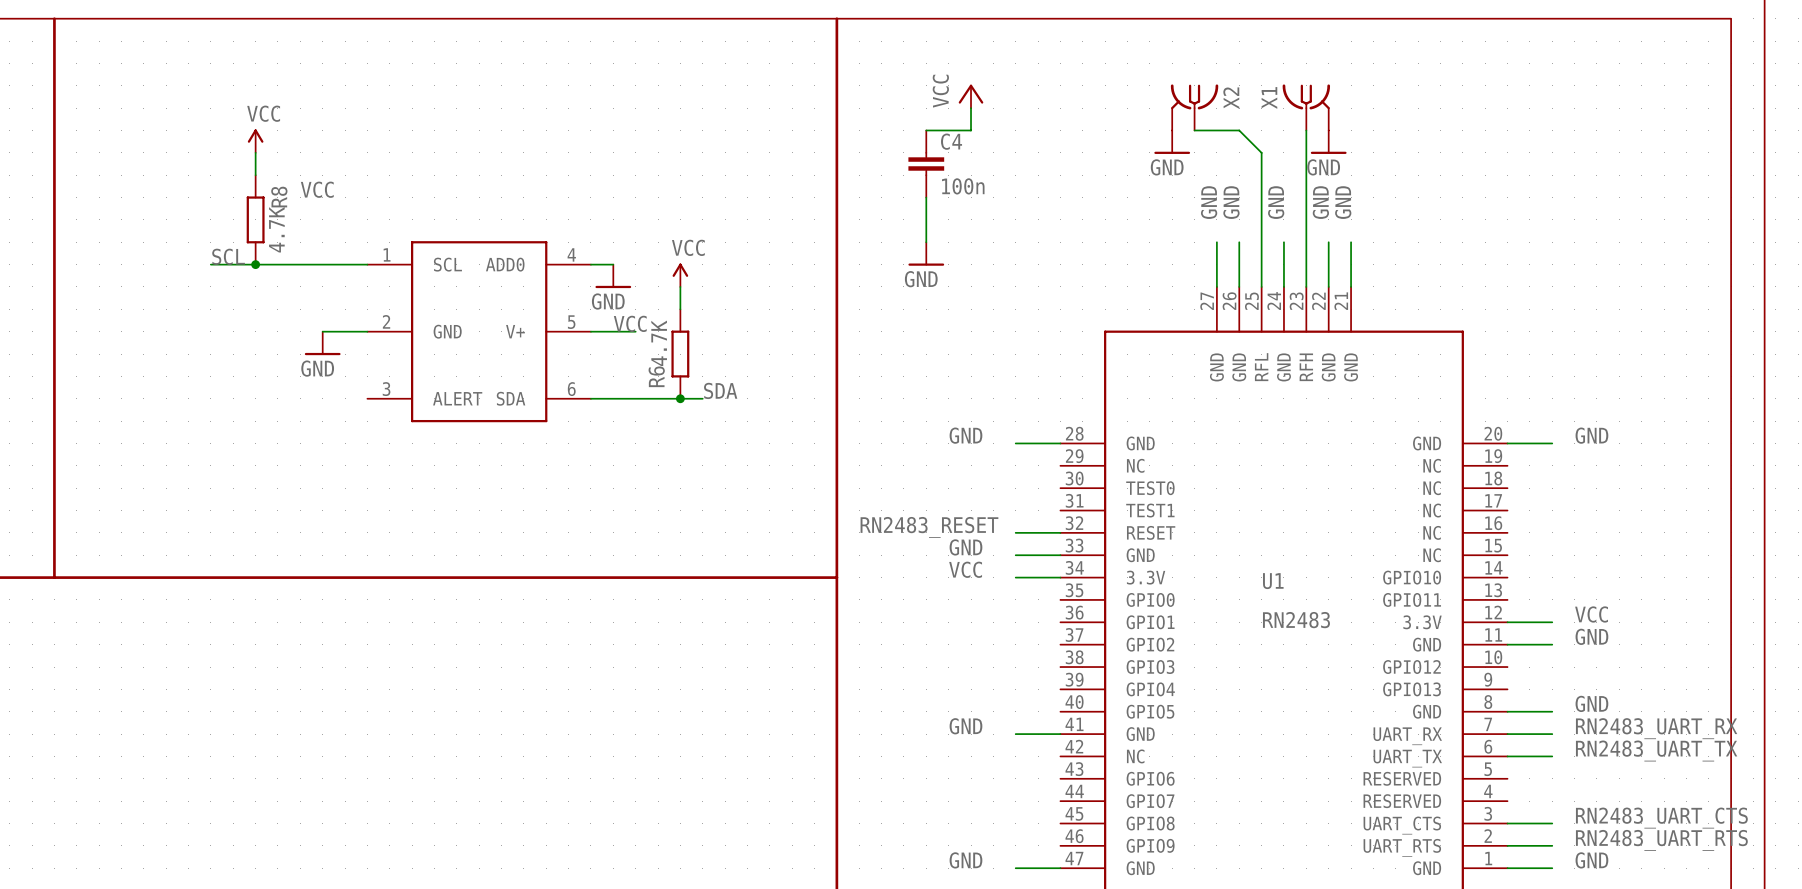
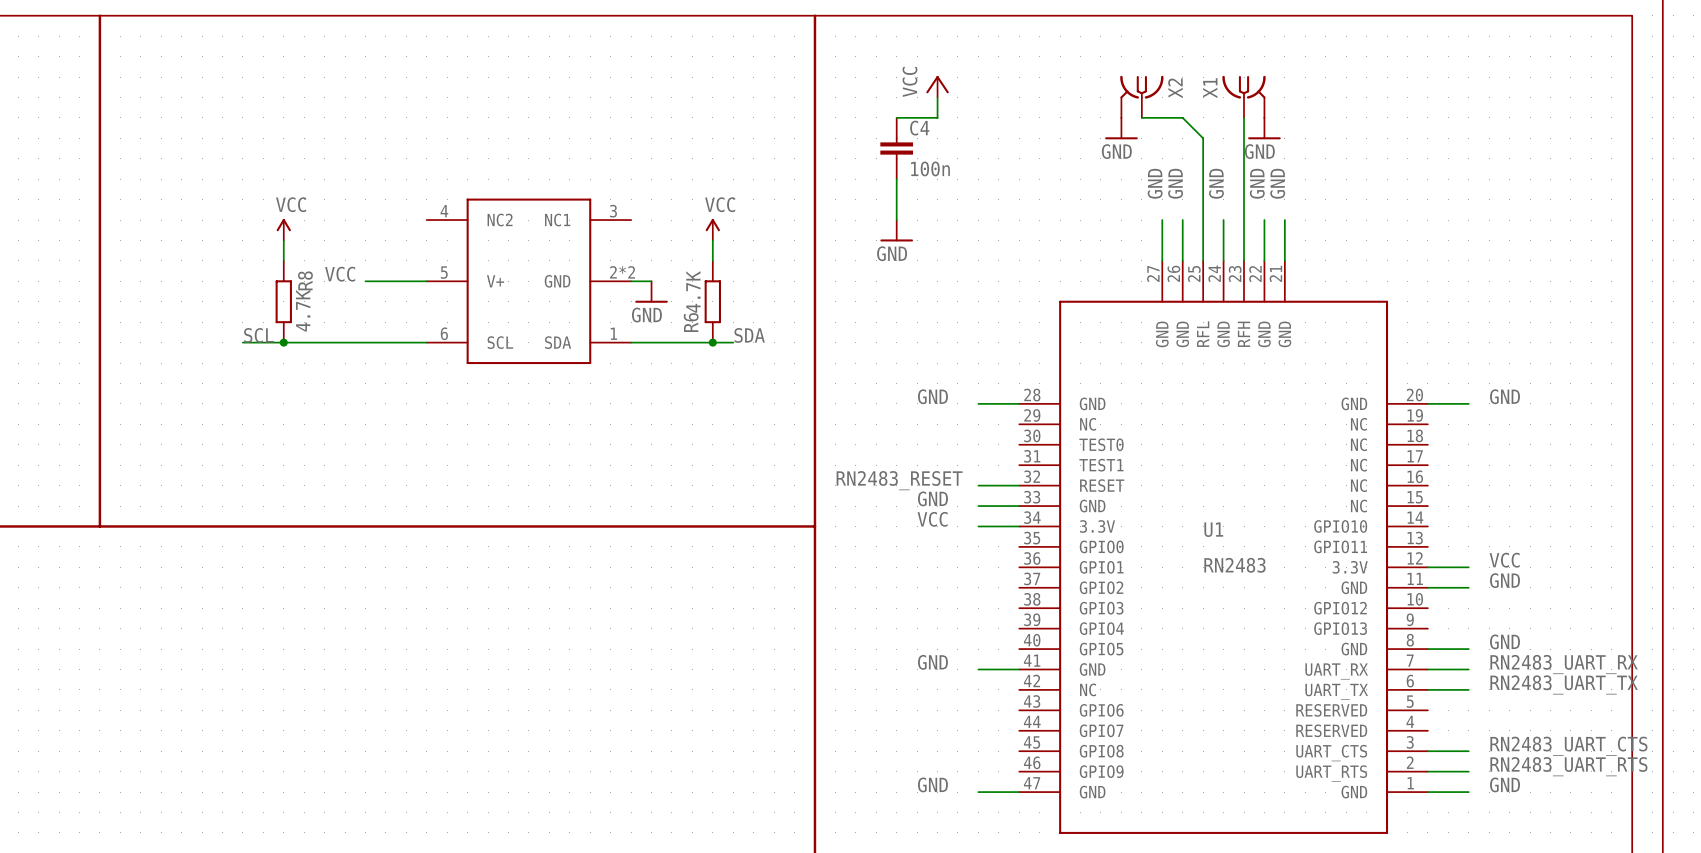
power symbol position: VCC (255, 141) -> VCC (283, 229)
wire: (255, 152) (255, 175) -> (283, 240) (283, 260)
label position: VCC (317, 189) -> VCC (340, 274)
R8 position: (255, 219) -> (283, 301)
label position: SCL (228, 256) -> SCL (259, 335)
wire: (210, 264) (367, 264) -> none
junction: (255, 264) -> none
wire: (590, 264) (613, 264) -> (631, 281) (651, 281)
power symbol position: VCC (680, 275) -> VCC (712, 229)
power symbol position: GND (613, 276) -> GND (651, 292)
wire: (680, 286) (680, 309) -> (712, 240) (712, 260)
wire: none -> (365, 281) (426, 281)
part: none -> (528, 281)
label: VCC (630, 323) -> none
wire: (322, 331) (367, 331) -> none
part: (479, 331) -> none
wire: (590, 331) (635, 331) -> none
power symbol: GND (322, 343) -> none
R6 position: (680, 354) -> (712, 301)
wire: none -> (242, 342) (426, 342)
junction: none -> (283, 342)
label position: SDA (720, 390) -> SDA (749, 335)
wire: (590, 398) (702, 398) -> (631, 342) (733, 342)
junction position: (680, 398) -> (712, 342)

